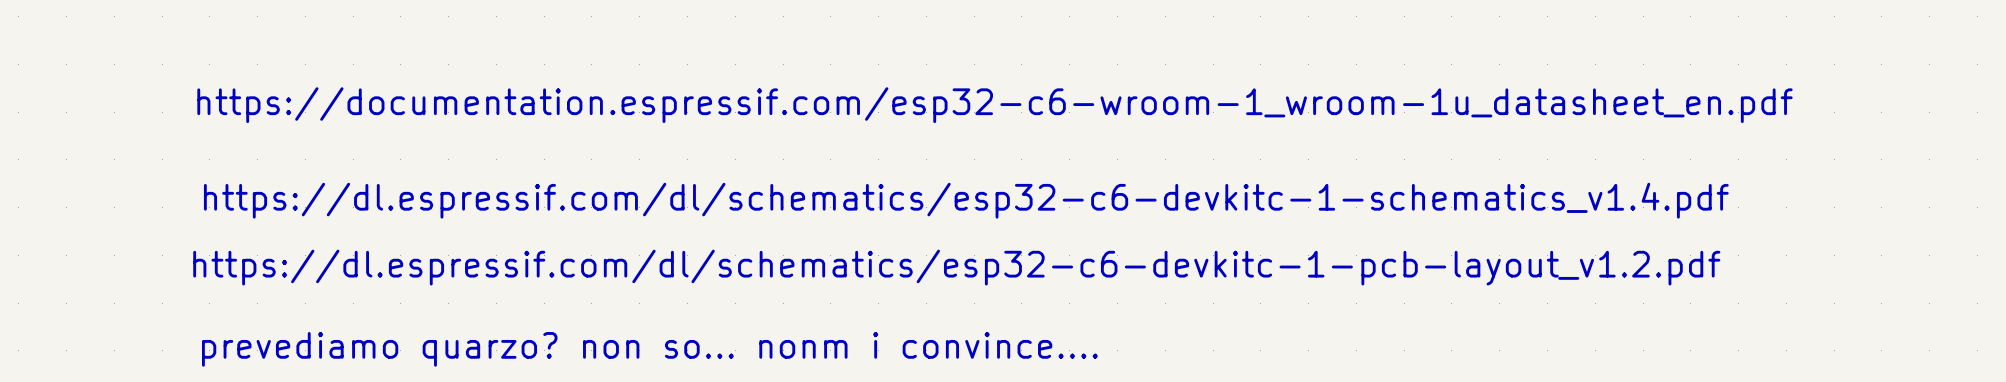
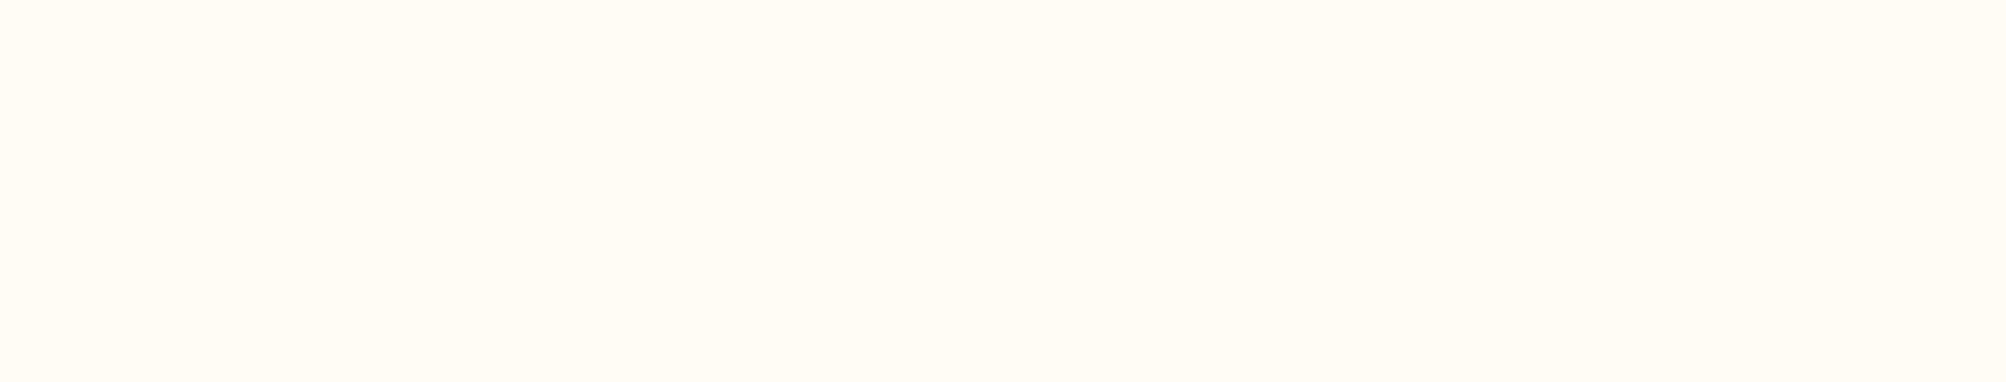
text: https://documentation.espressif.com/esp32-c6-wroom-1_wroom-1u_datasheet_en.pdf (994, 105) -> none
text: https://dl.espressif.com/dl/schematics/esp32-c6-devkitc-1-schematics_v1.4.pdf (966, 200) -> none
text: https://dl.espressif.com/dl/schematics/esp32-c6-devkitc-1-pcb-layout_v1.2.pdf (956, 267) -> none
text: prevediamo quarzo? non so... nonm i convince.... (649, 349) -> none

